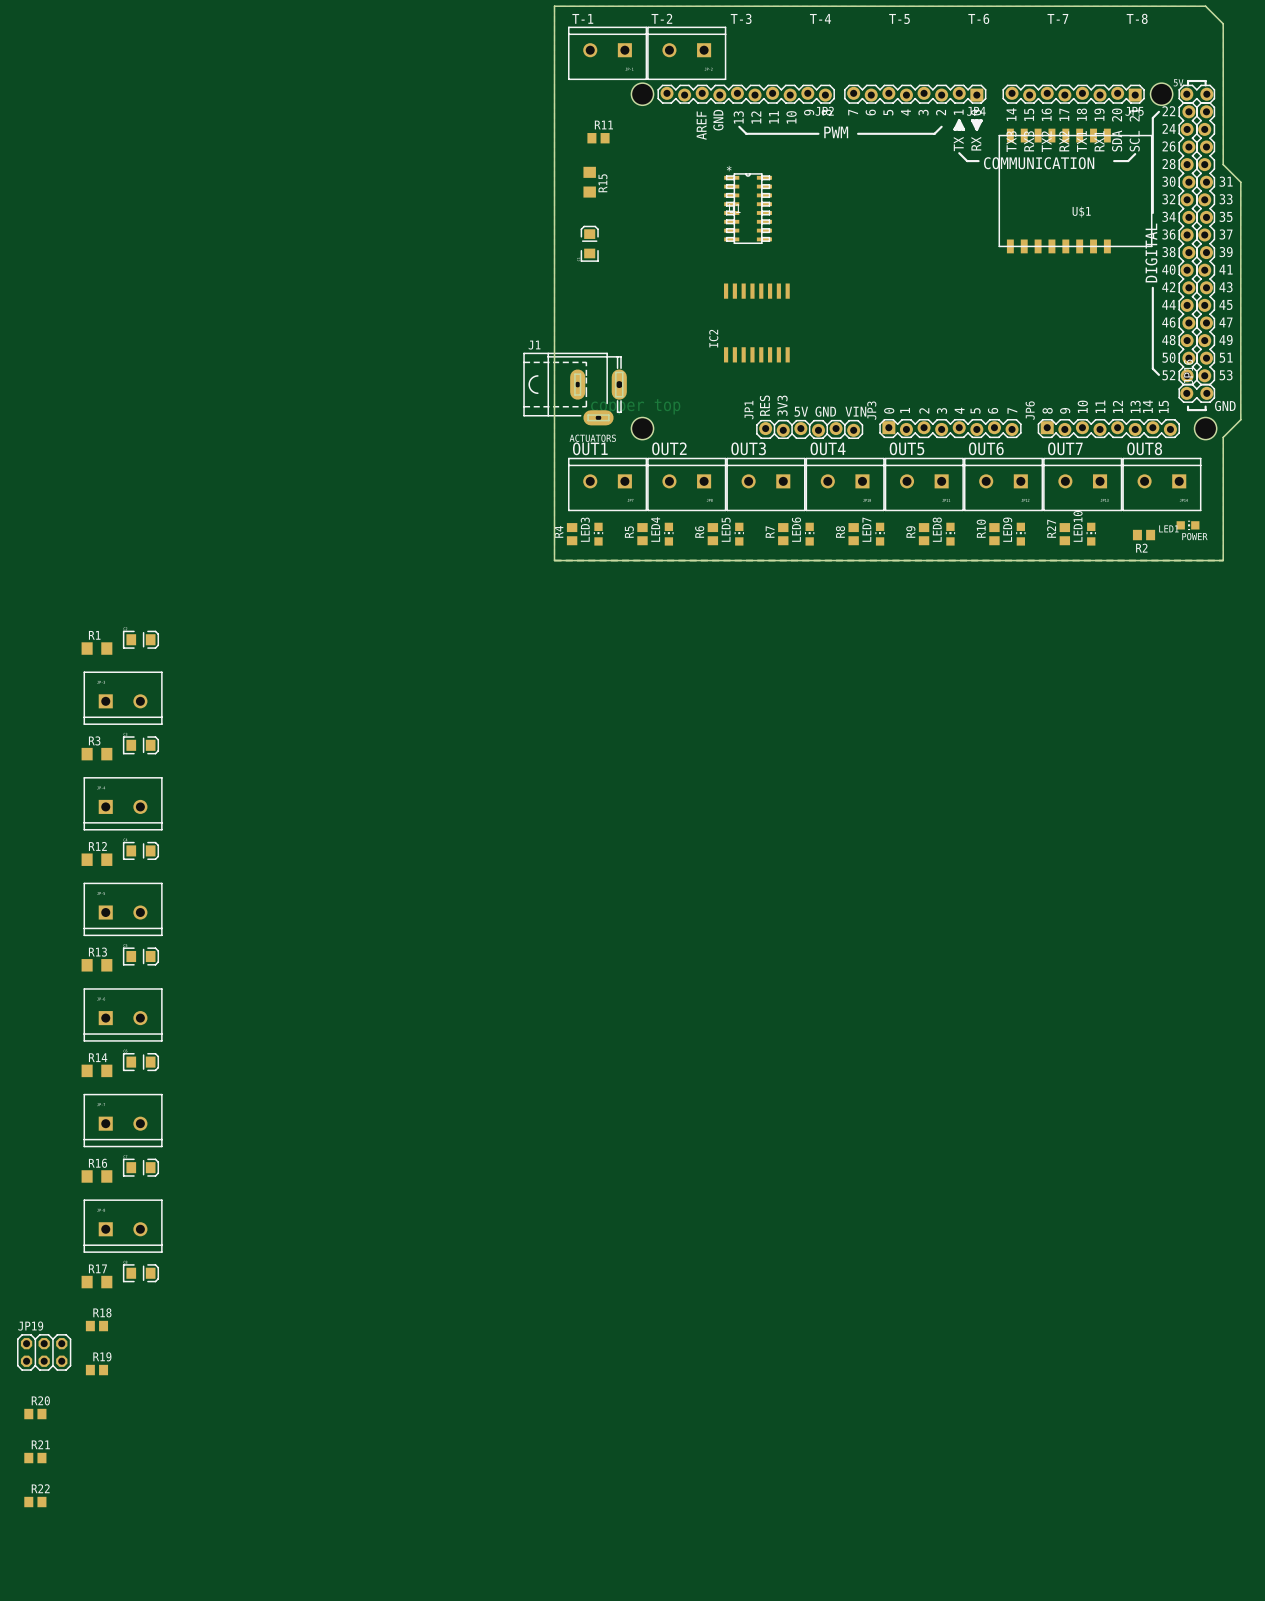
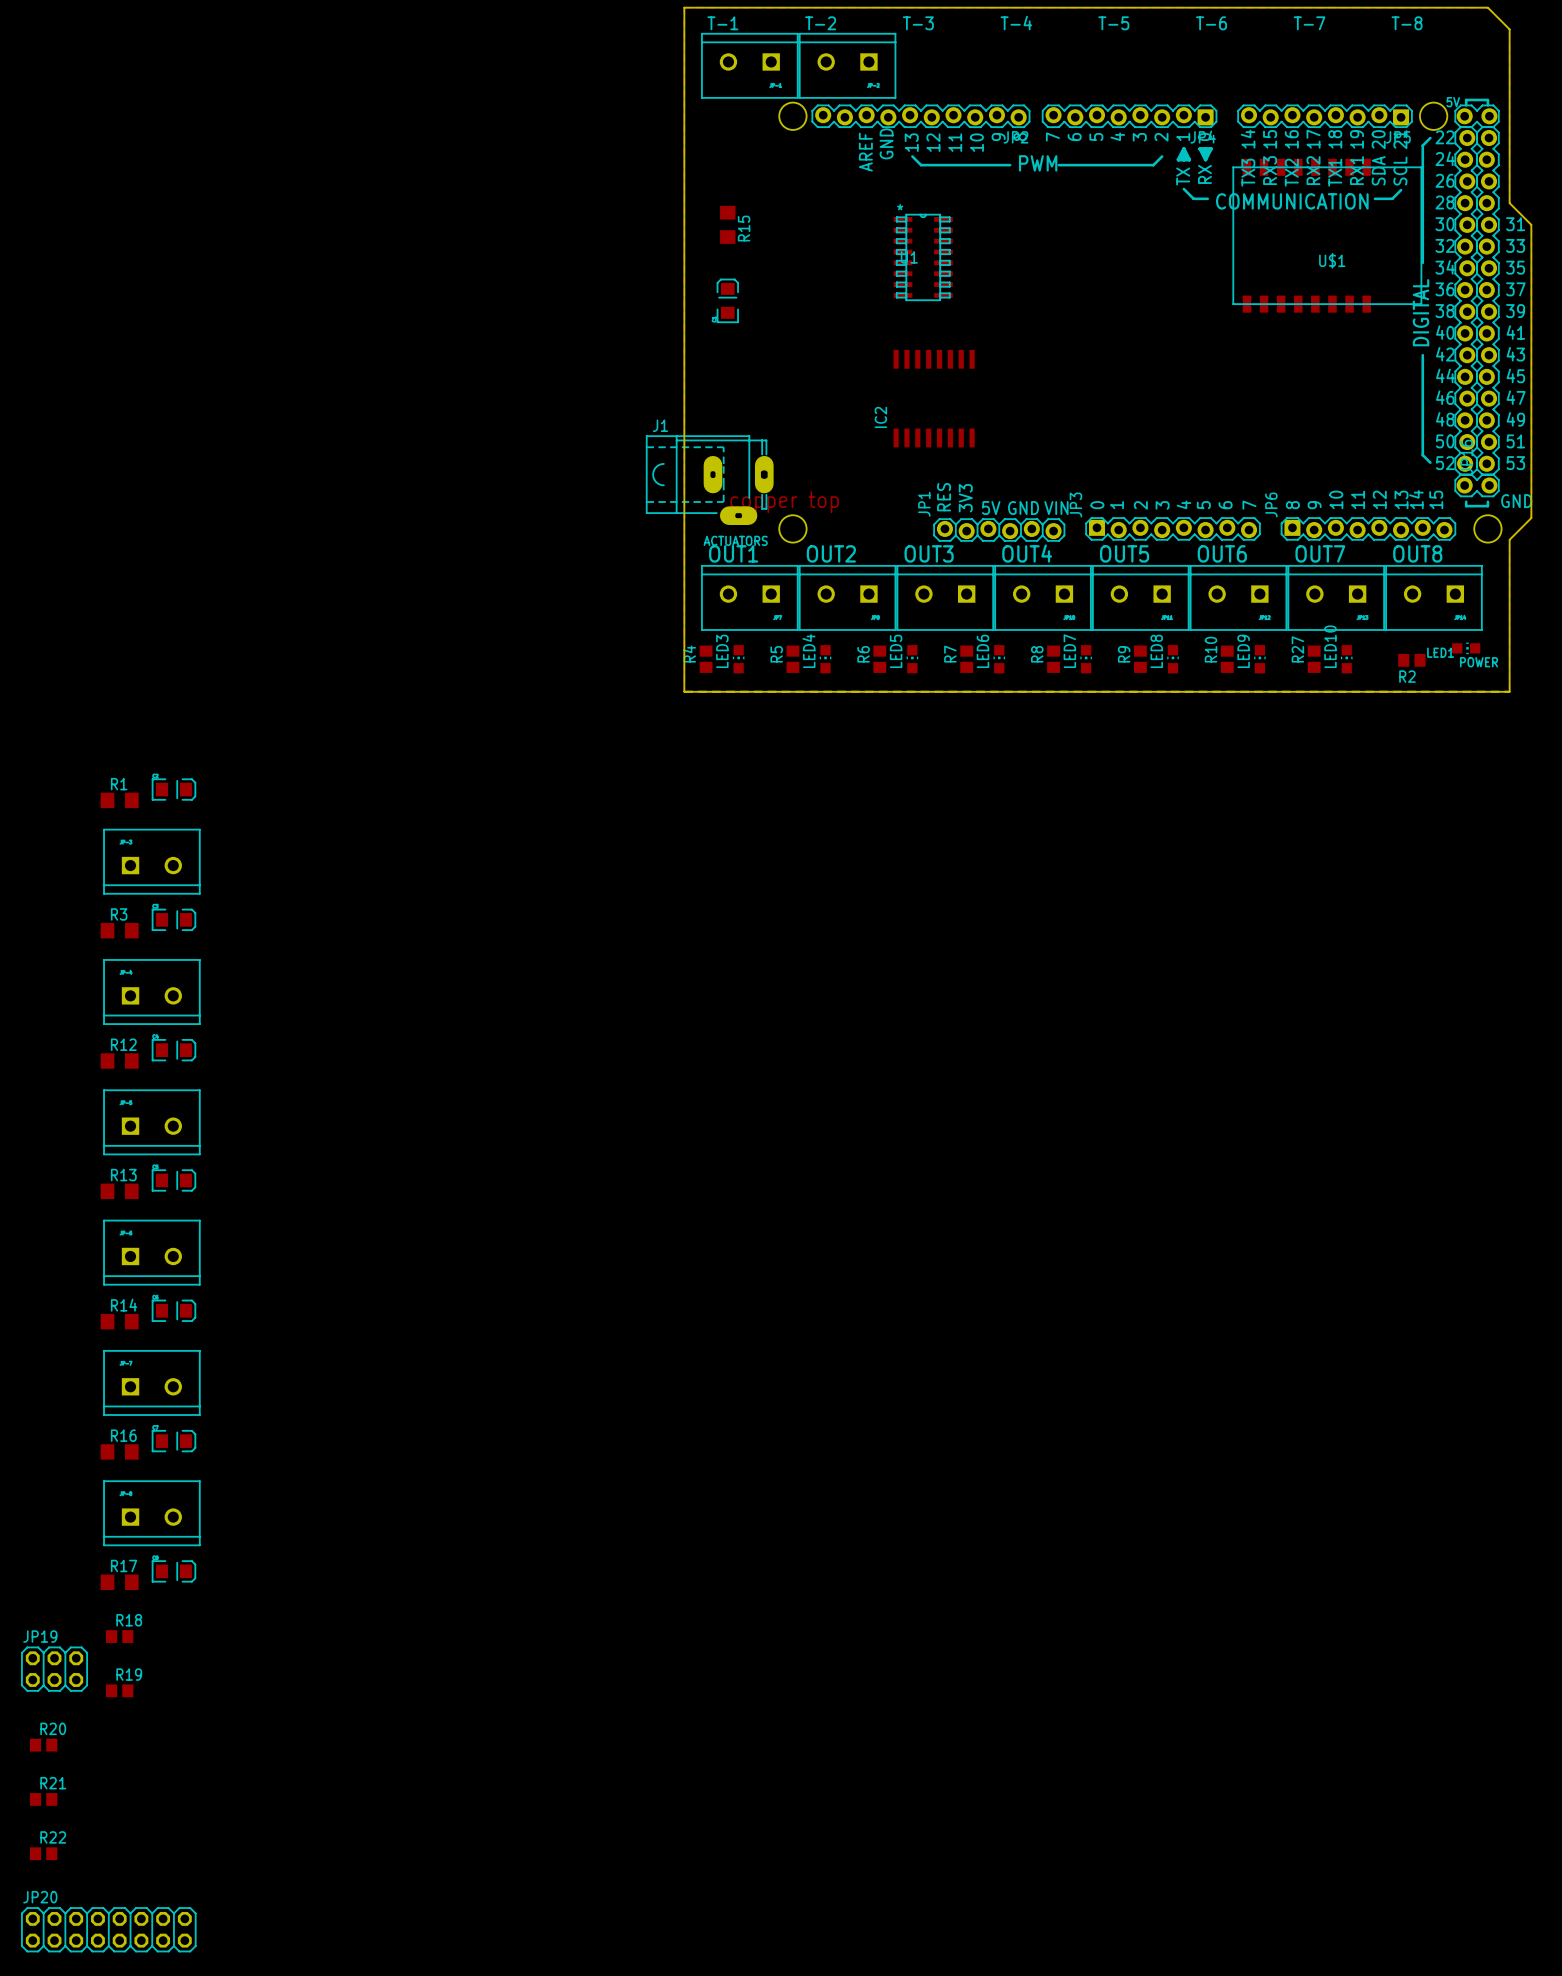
R11: (598, 138) -> none
JP20: none -> (108, 1929)

